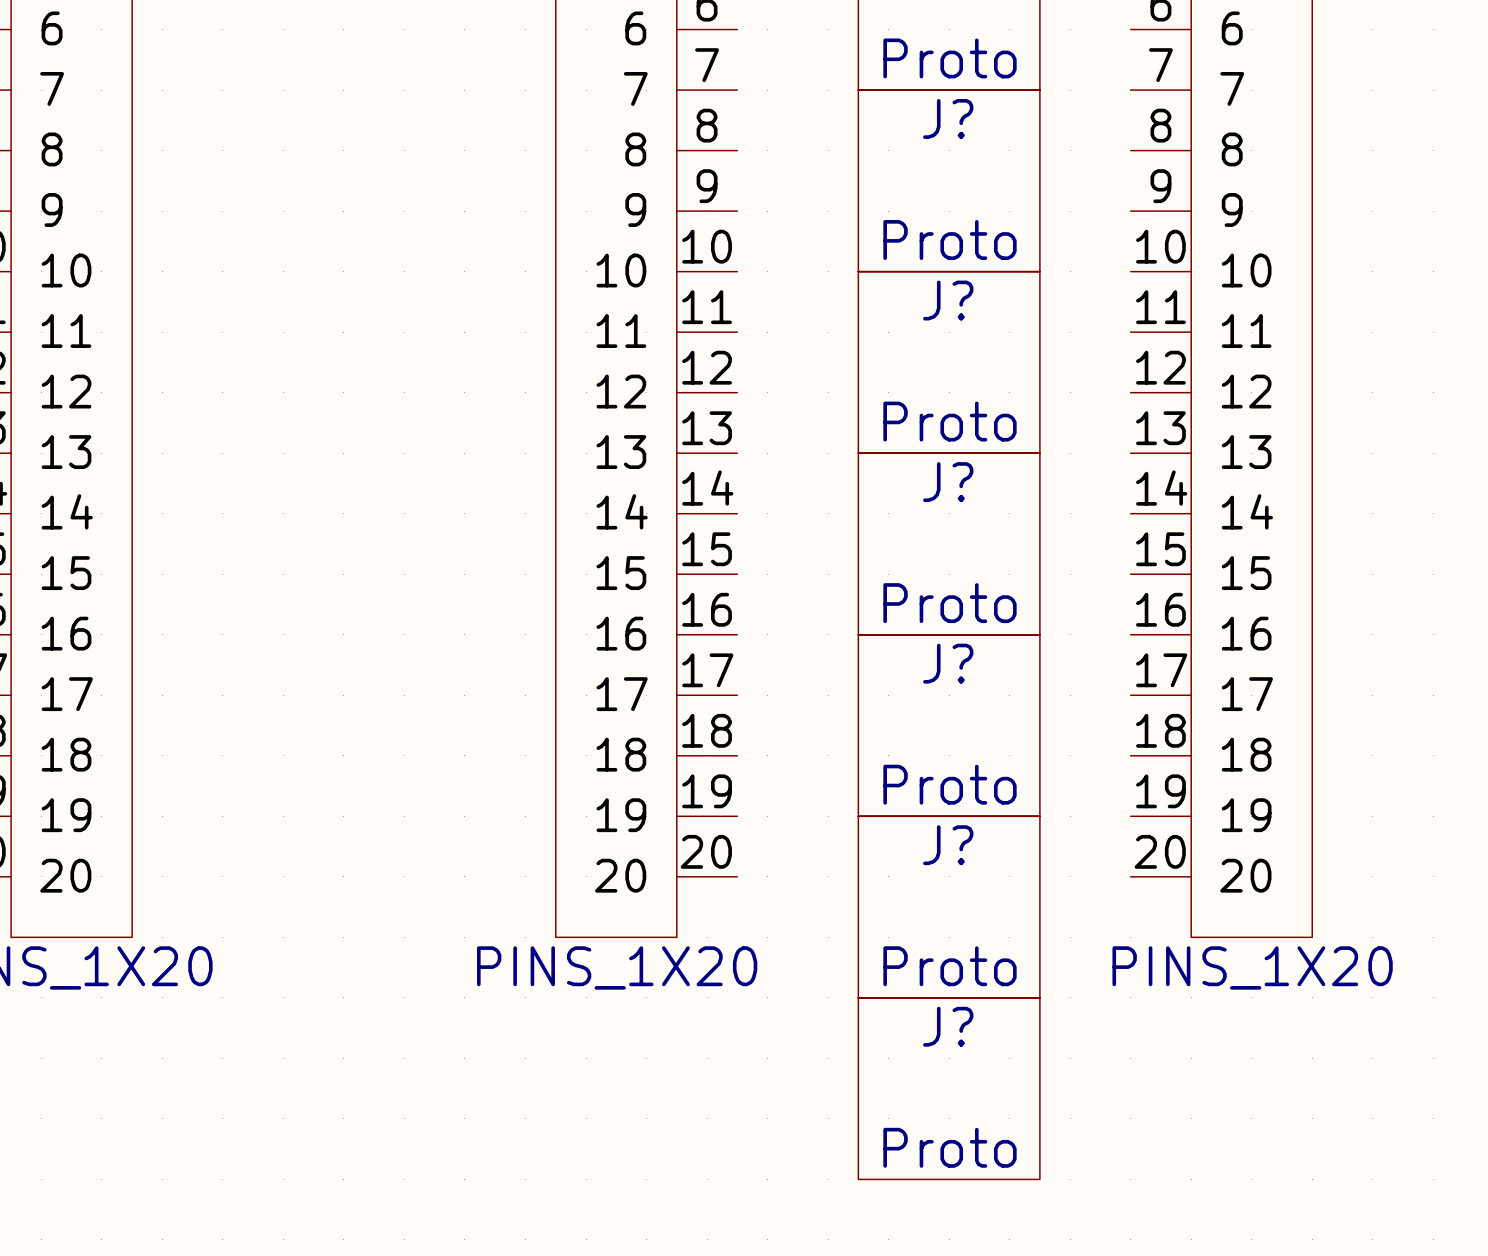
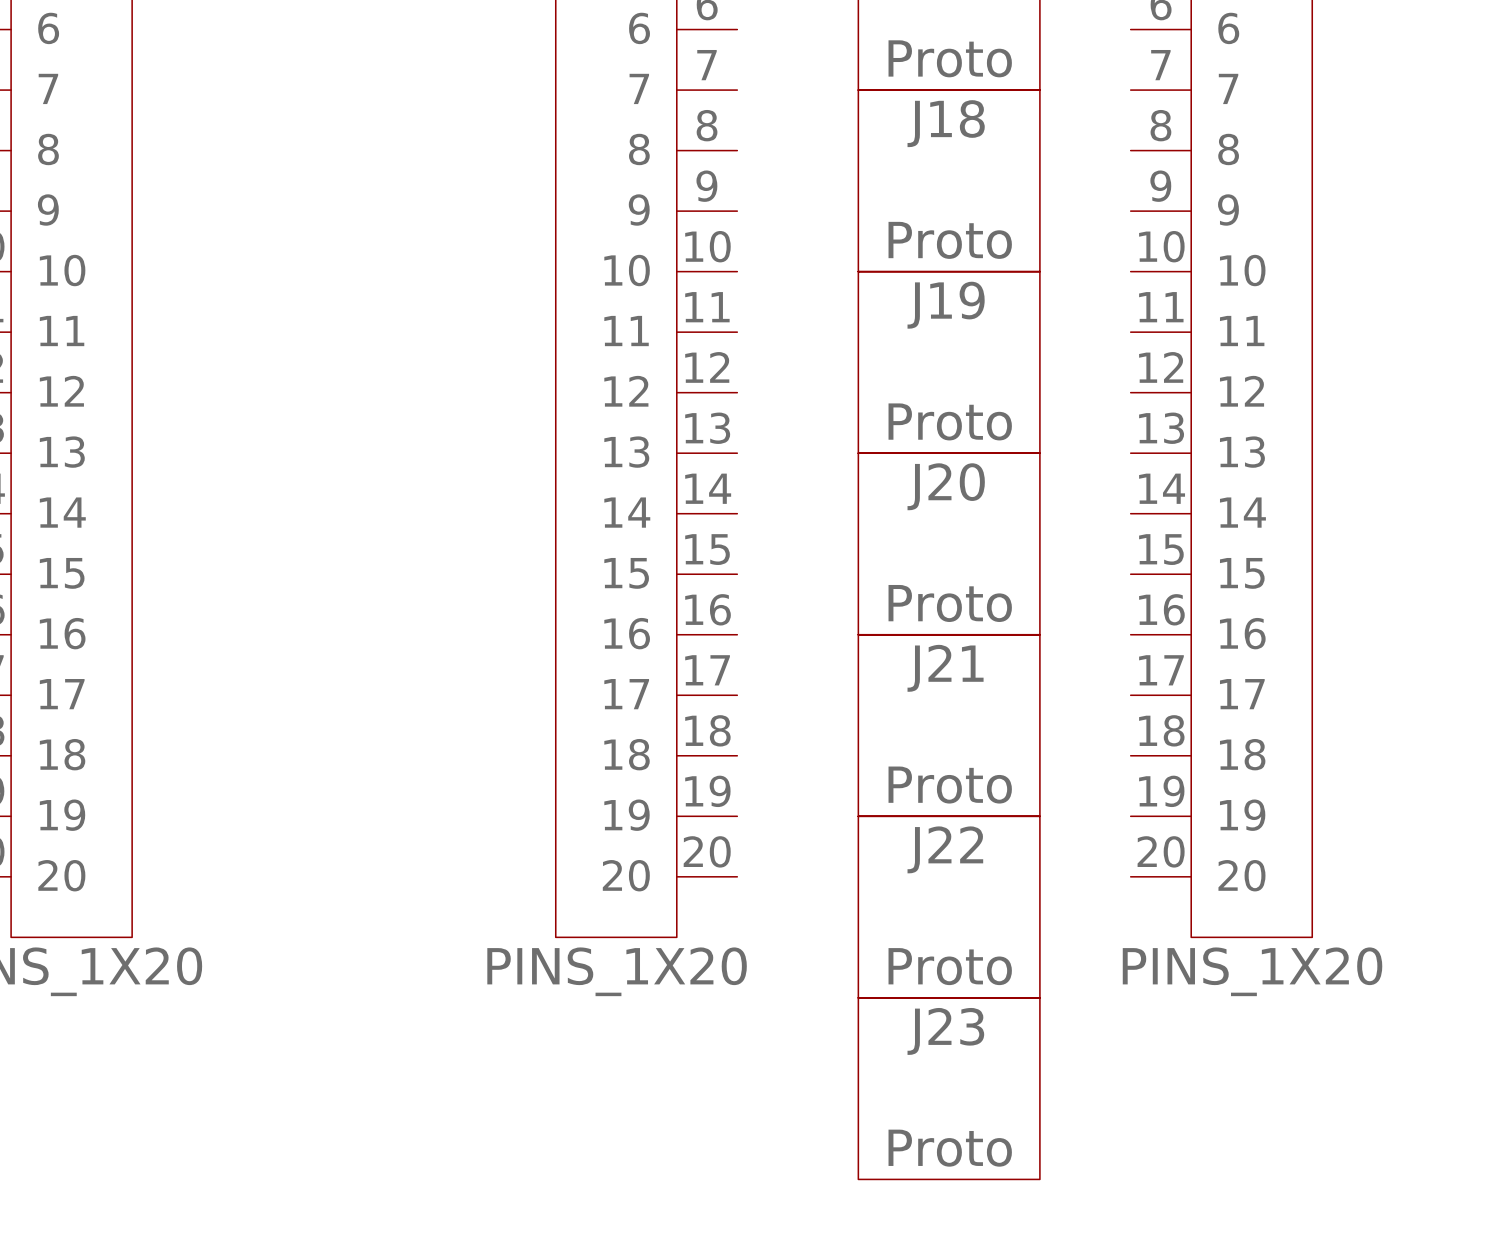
J? name: J? (948, 118) -> J18 (946, 123)
J? name: J? (948, 300) -> J19 (946, 305)
J? name: J? (948, 482) -> J20 (946, 486)
J? name: J? (948, 663) -> J21 (945, 668)
J? name: J? (948, 845) -> J22 (945, 849)
J? name: J? (948, 1026) -> J23 (945, 1031)

